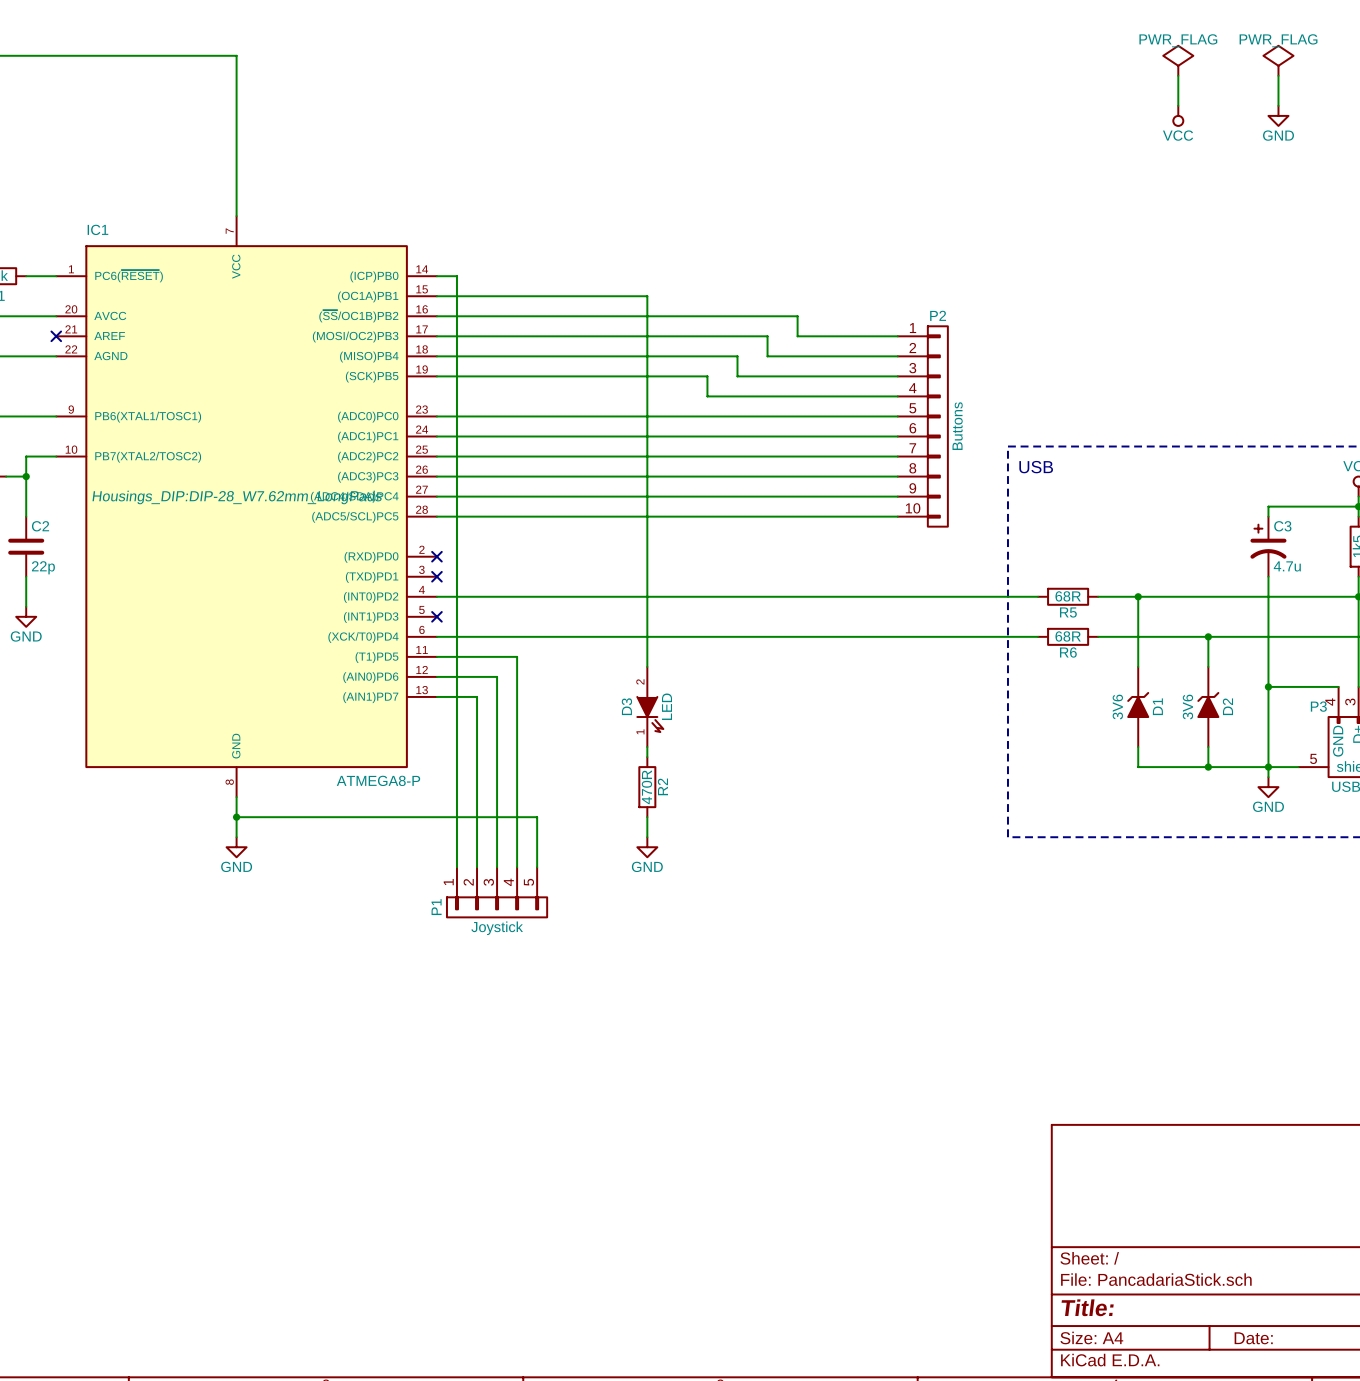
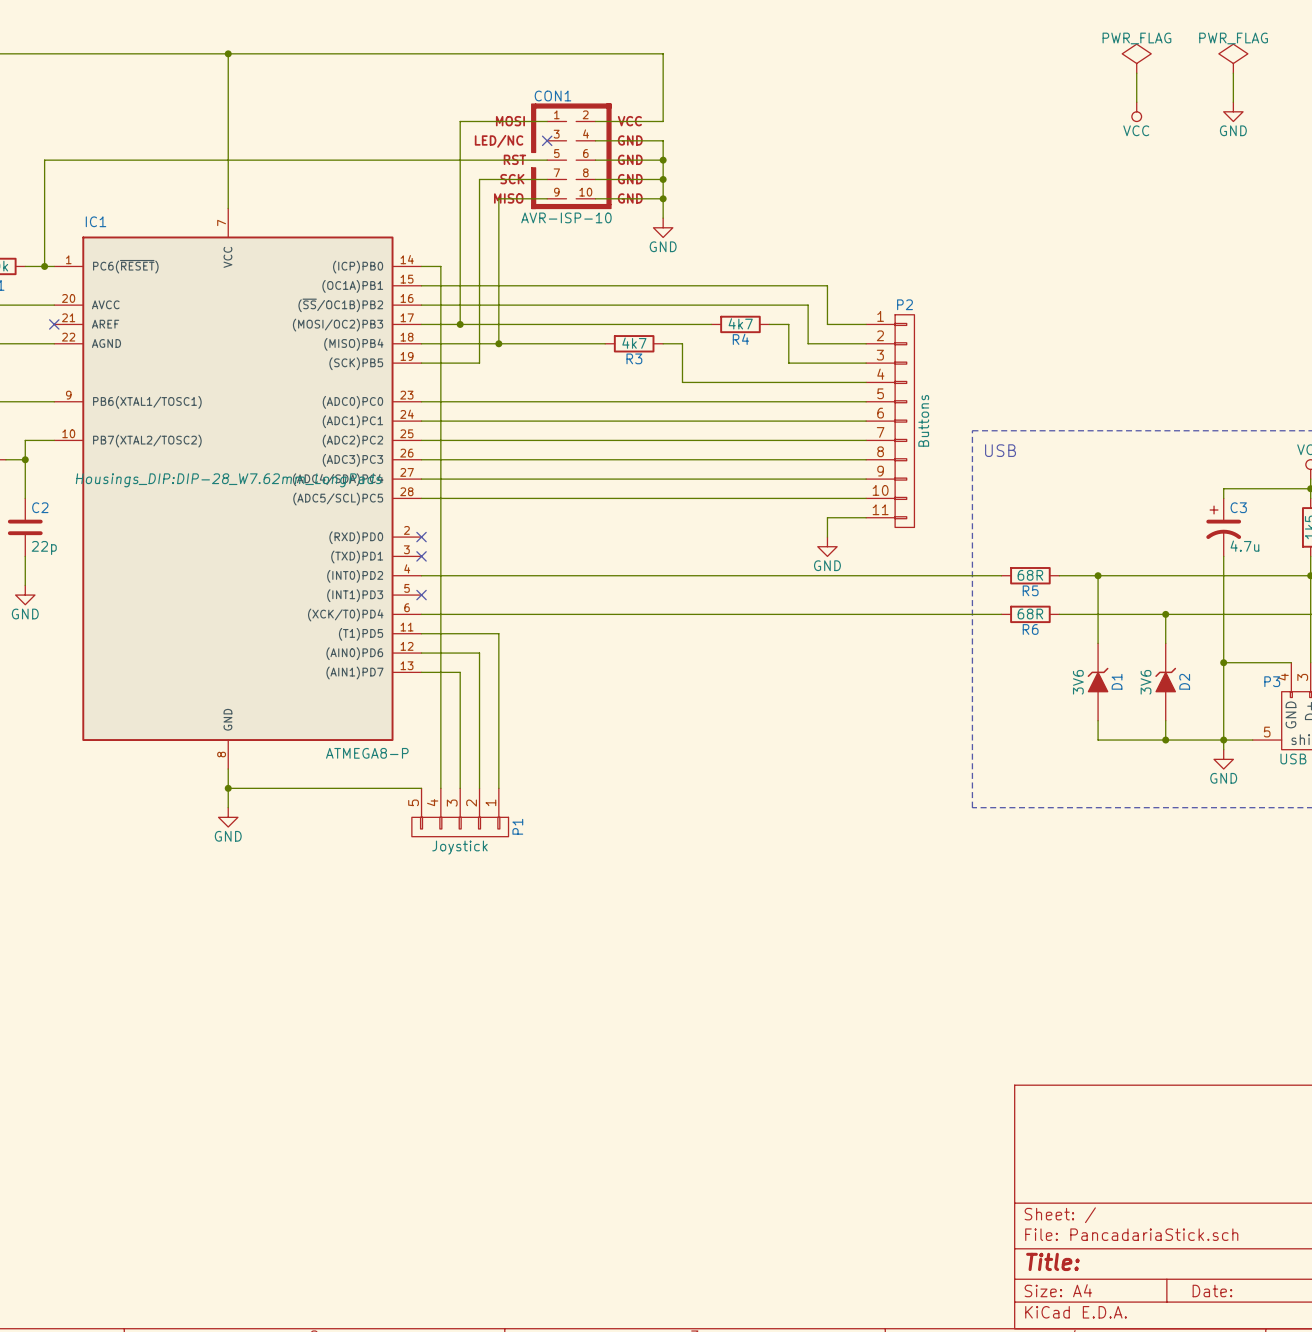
wire: none -> (228, 53) (663, 53) (663, 121) (595, 121)
junction: none -> (228, 53)
wire: none -> (547, 121) (460, 121) (460, 324)
no-connect mark: none -> (547, 140)
wire: none -> (595, 140) (663, 140) (663, 218)
CON1: none -> AVR-ISP-10 (571, 156)
wire: none -> (547, 160) (44, 160) (44, 266)
wire: none -> (595, 160) (663, 160)
junction: none -> (663, 160)
wire: none -> (595, 179) (663, 179)
junction: none -> (663, 179)
wire: none -> (547, 198) (498, 198) (498, 343)
wire: none -> (595, 198) (663, 198)
junction: none -> (663, 198)
power symbol: none -> GND (663, 227)
junction: none -> (44, 266)
wire: (647, 296) (647, 666) -> (624, 285) (827, 285) (827, 324)
wire: (797, 316) (797, 336) -> (769, 305) (808, 305) (808, 343)
P2 symbol: [897, 326, 948, 527] -> [866, 314, 915, 528]
junction: none -> (460, 324)
wire: (737, 336) (767, 336) (767, 356) (837, 356) -> none
R4: none -> 4k7 (740, 324)
wire: (817, 336) (857, 336) -> (788, 324) (788, 363)
junction: none -> (498, 343)
wire: (627, 356) (687, 356) -> none
R3: none -> 4k7 (634, 343)
wire: (707, 356) (737, 356) (737, 376) (817, 376) -> (682, 343) (682, 363)
wire: (497, 376) (707, 376) -> (479, 363) (479, 179) (547, 179)
wire: none -> (866, 517) (827, 517) (827, 537)
power symbol: none -> GND (827, 546)
D3: LED (650, 706) -> none
wire: (647, 747) (647, 757) -> none
R2: 470R (647, 787) -> none
wire: (436, 817) (537, 817) (537, 867) -> none
wire: (647, 817) (647, 837) -> none
power symbol: GND (647, 847) -> none
P1 flip: as is (497, 907) -> left-right (460, 827)

